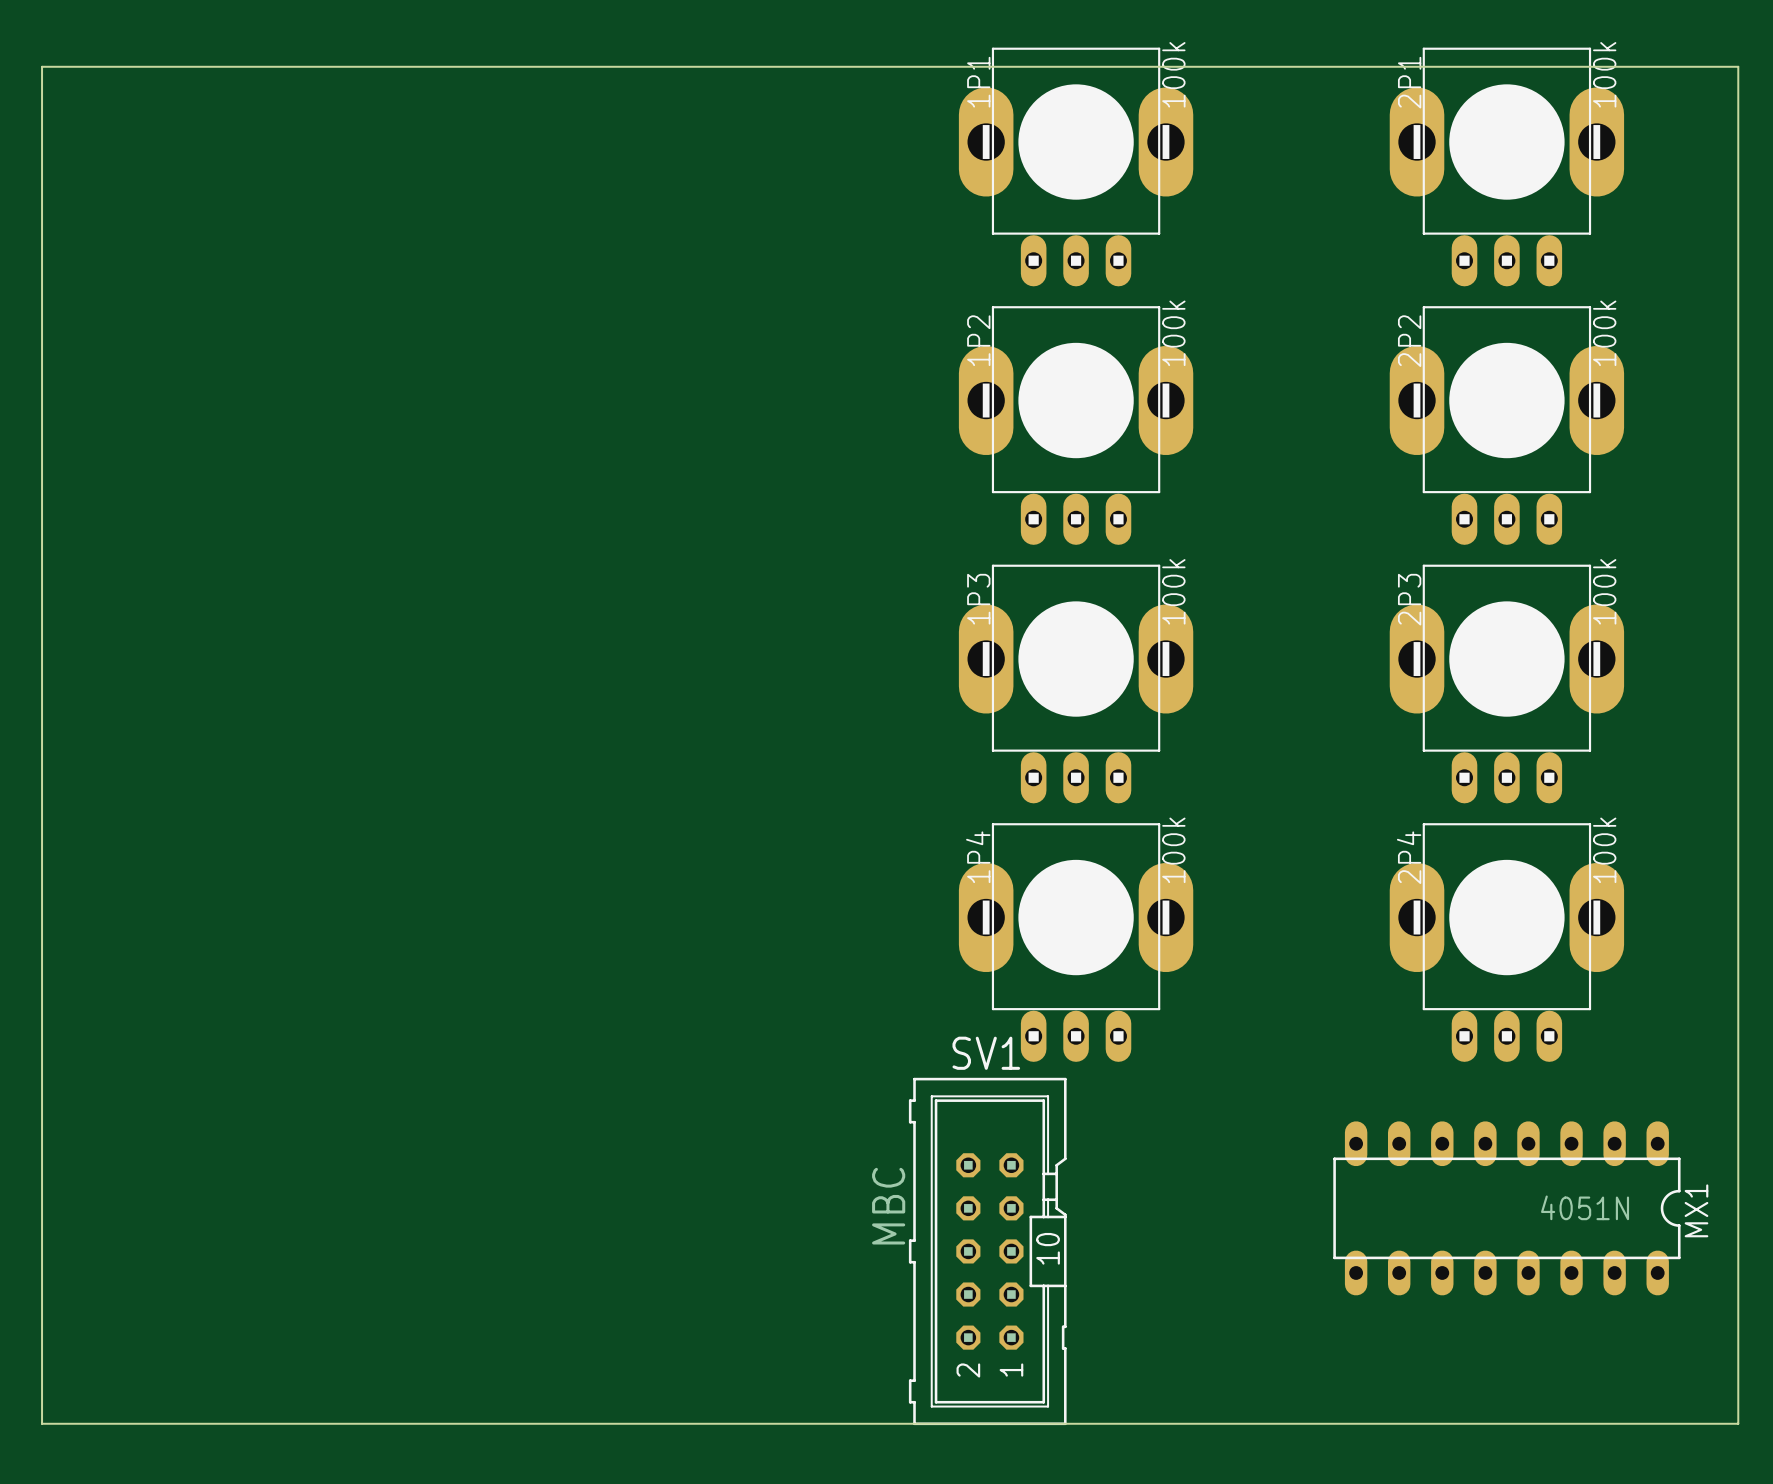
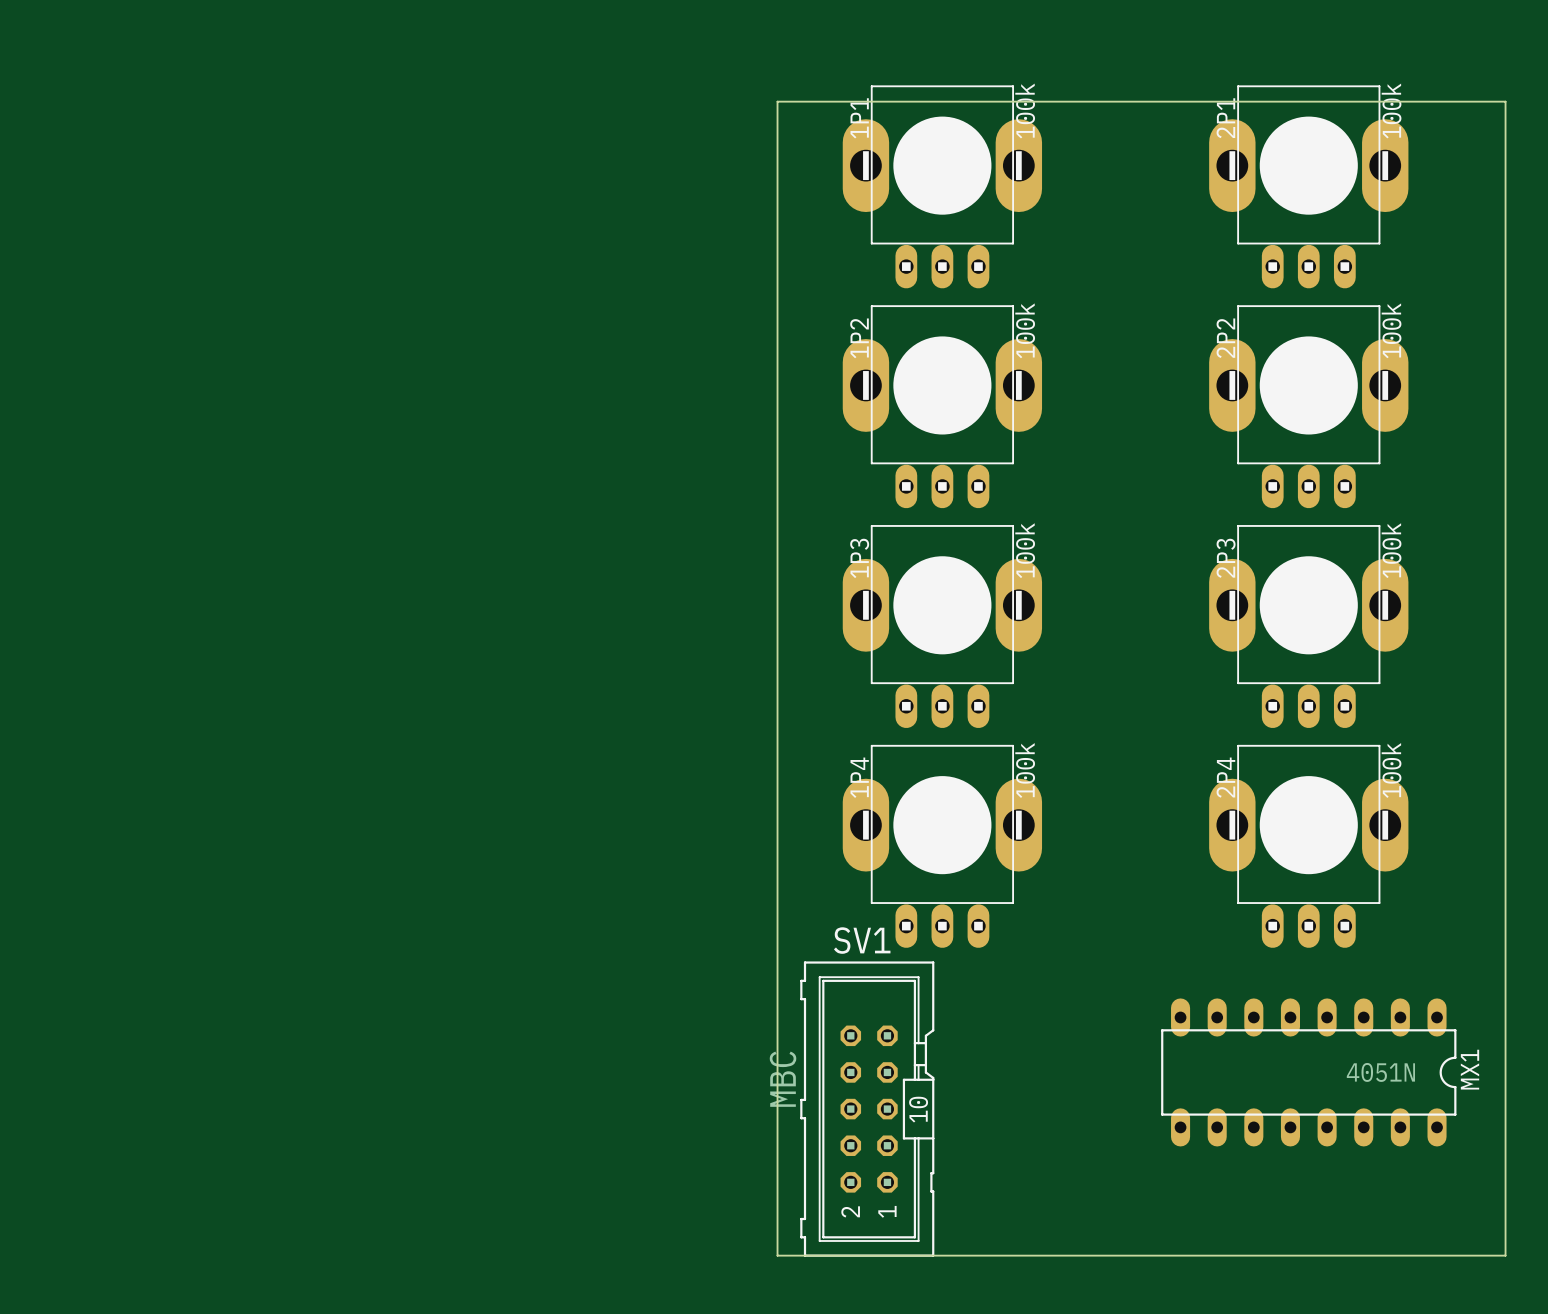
board edge: (882, 66) (42, 66) (42, 1423) (882, 1423) -> (777, 101) (777, 1255)

